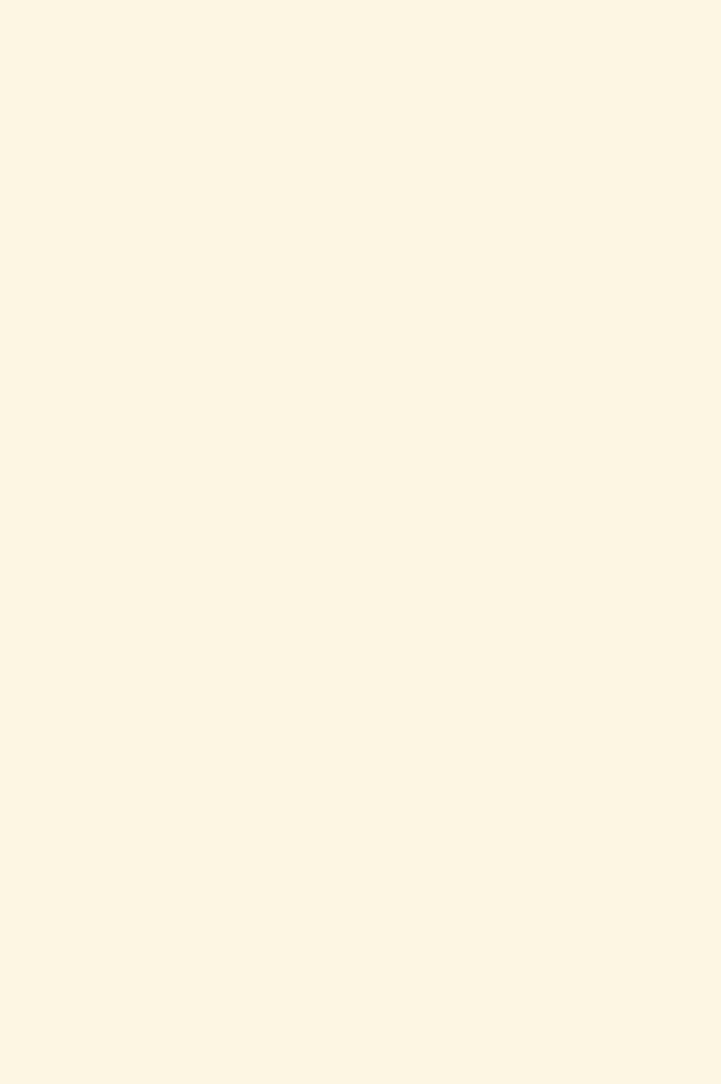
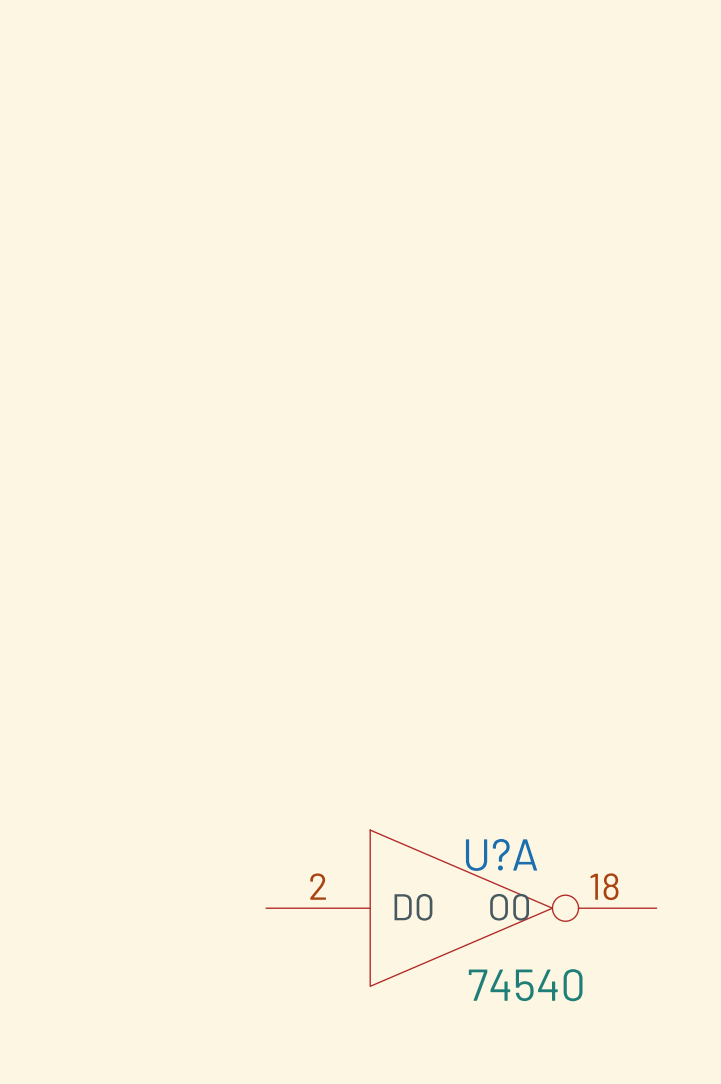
U?A: none -> 74540 (461, 908)

